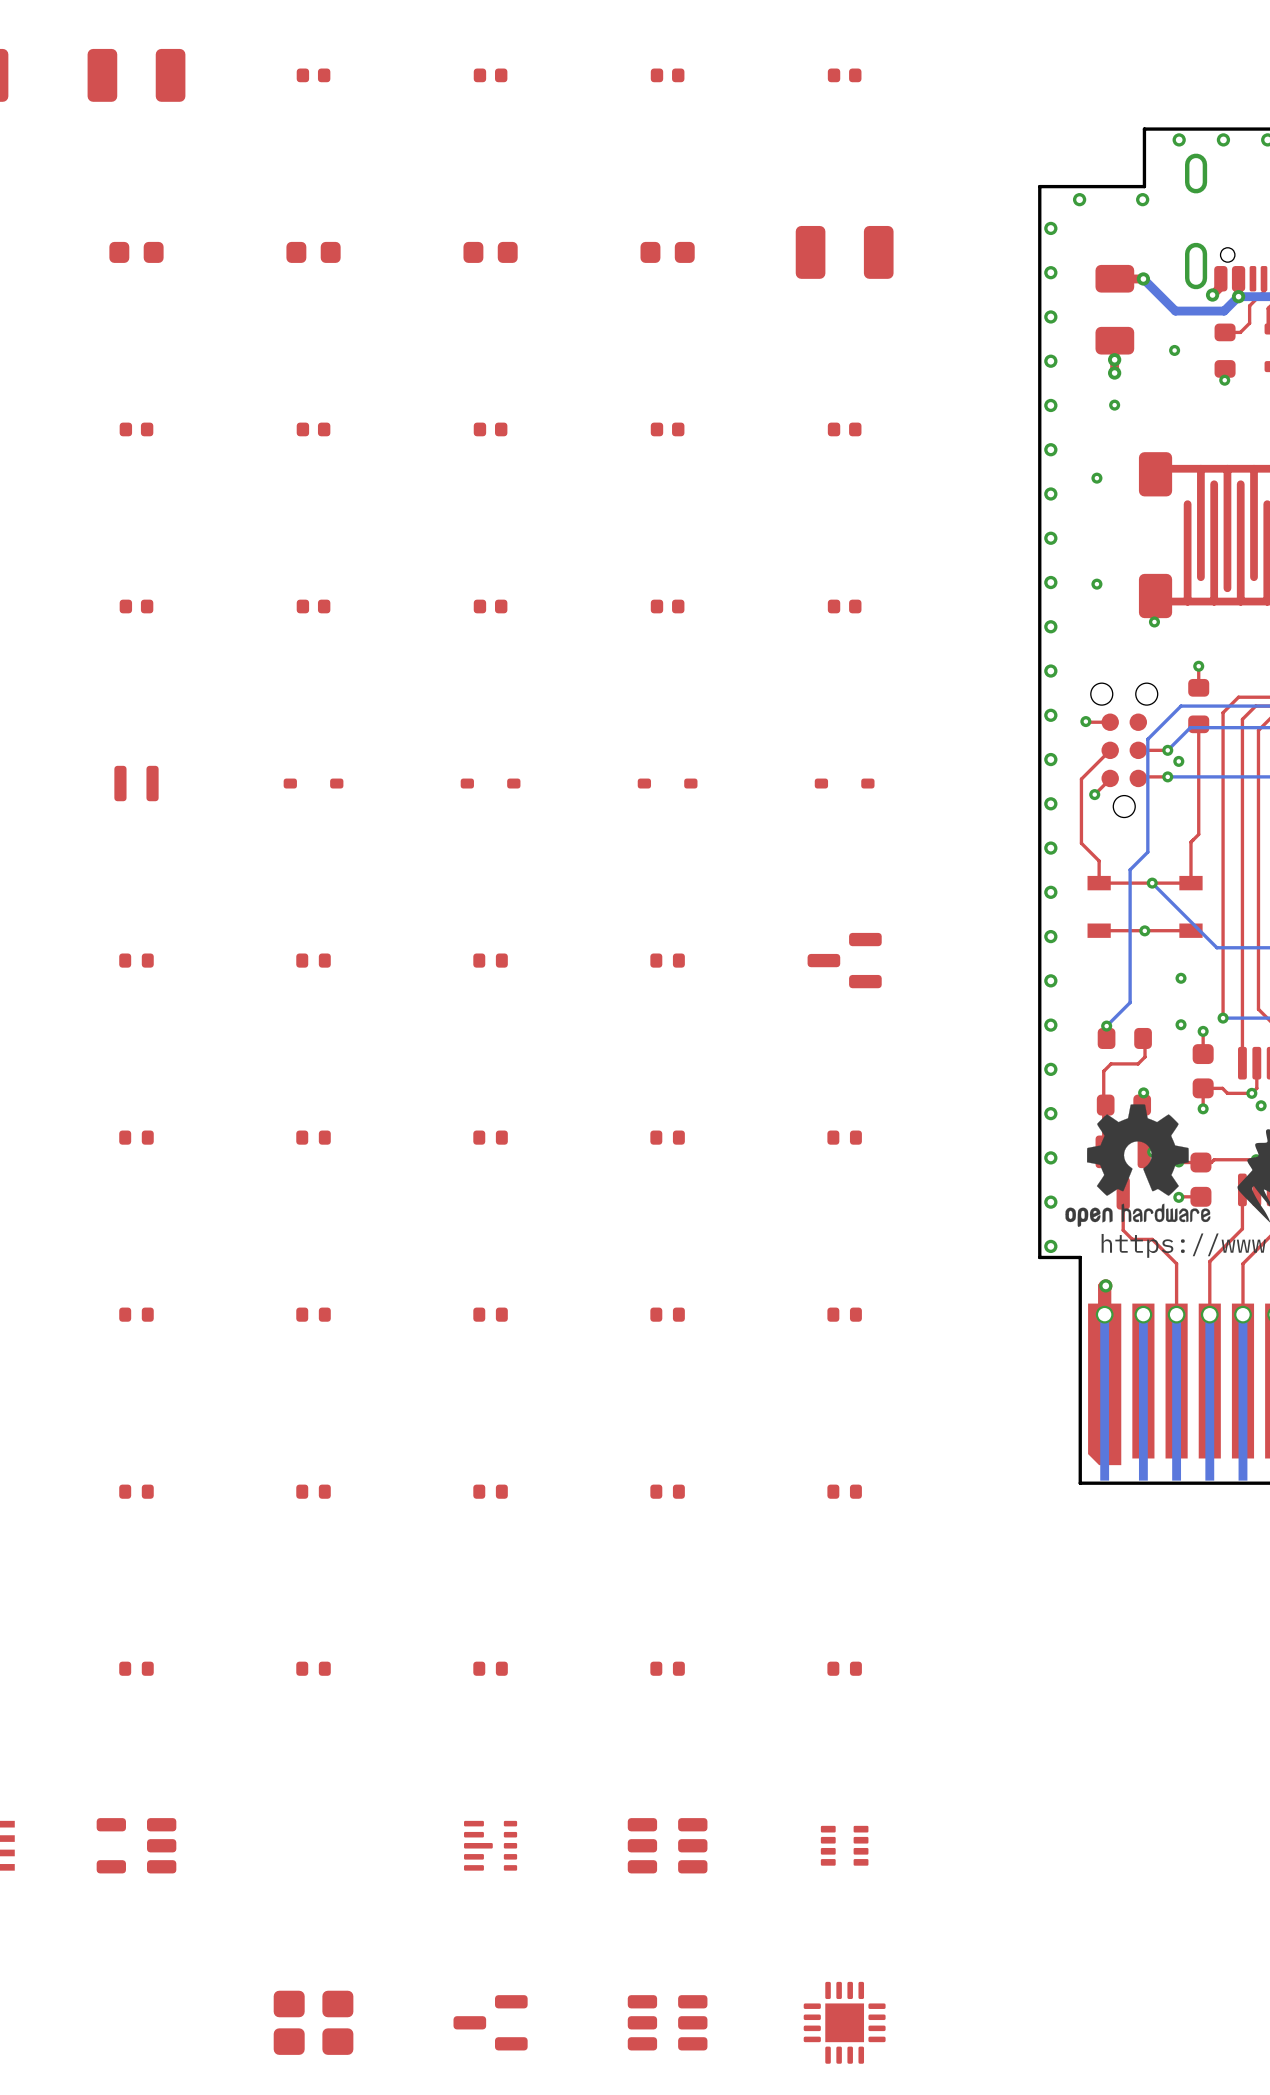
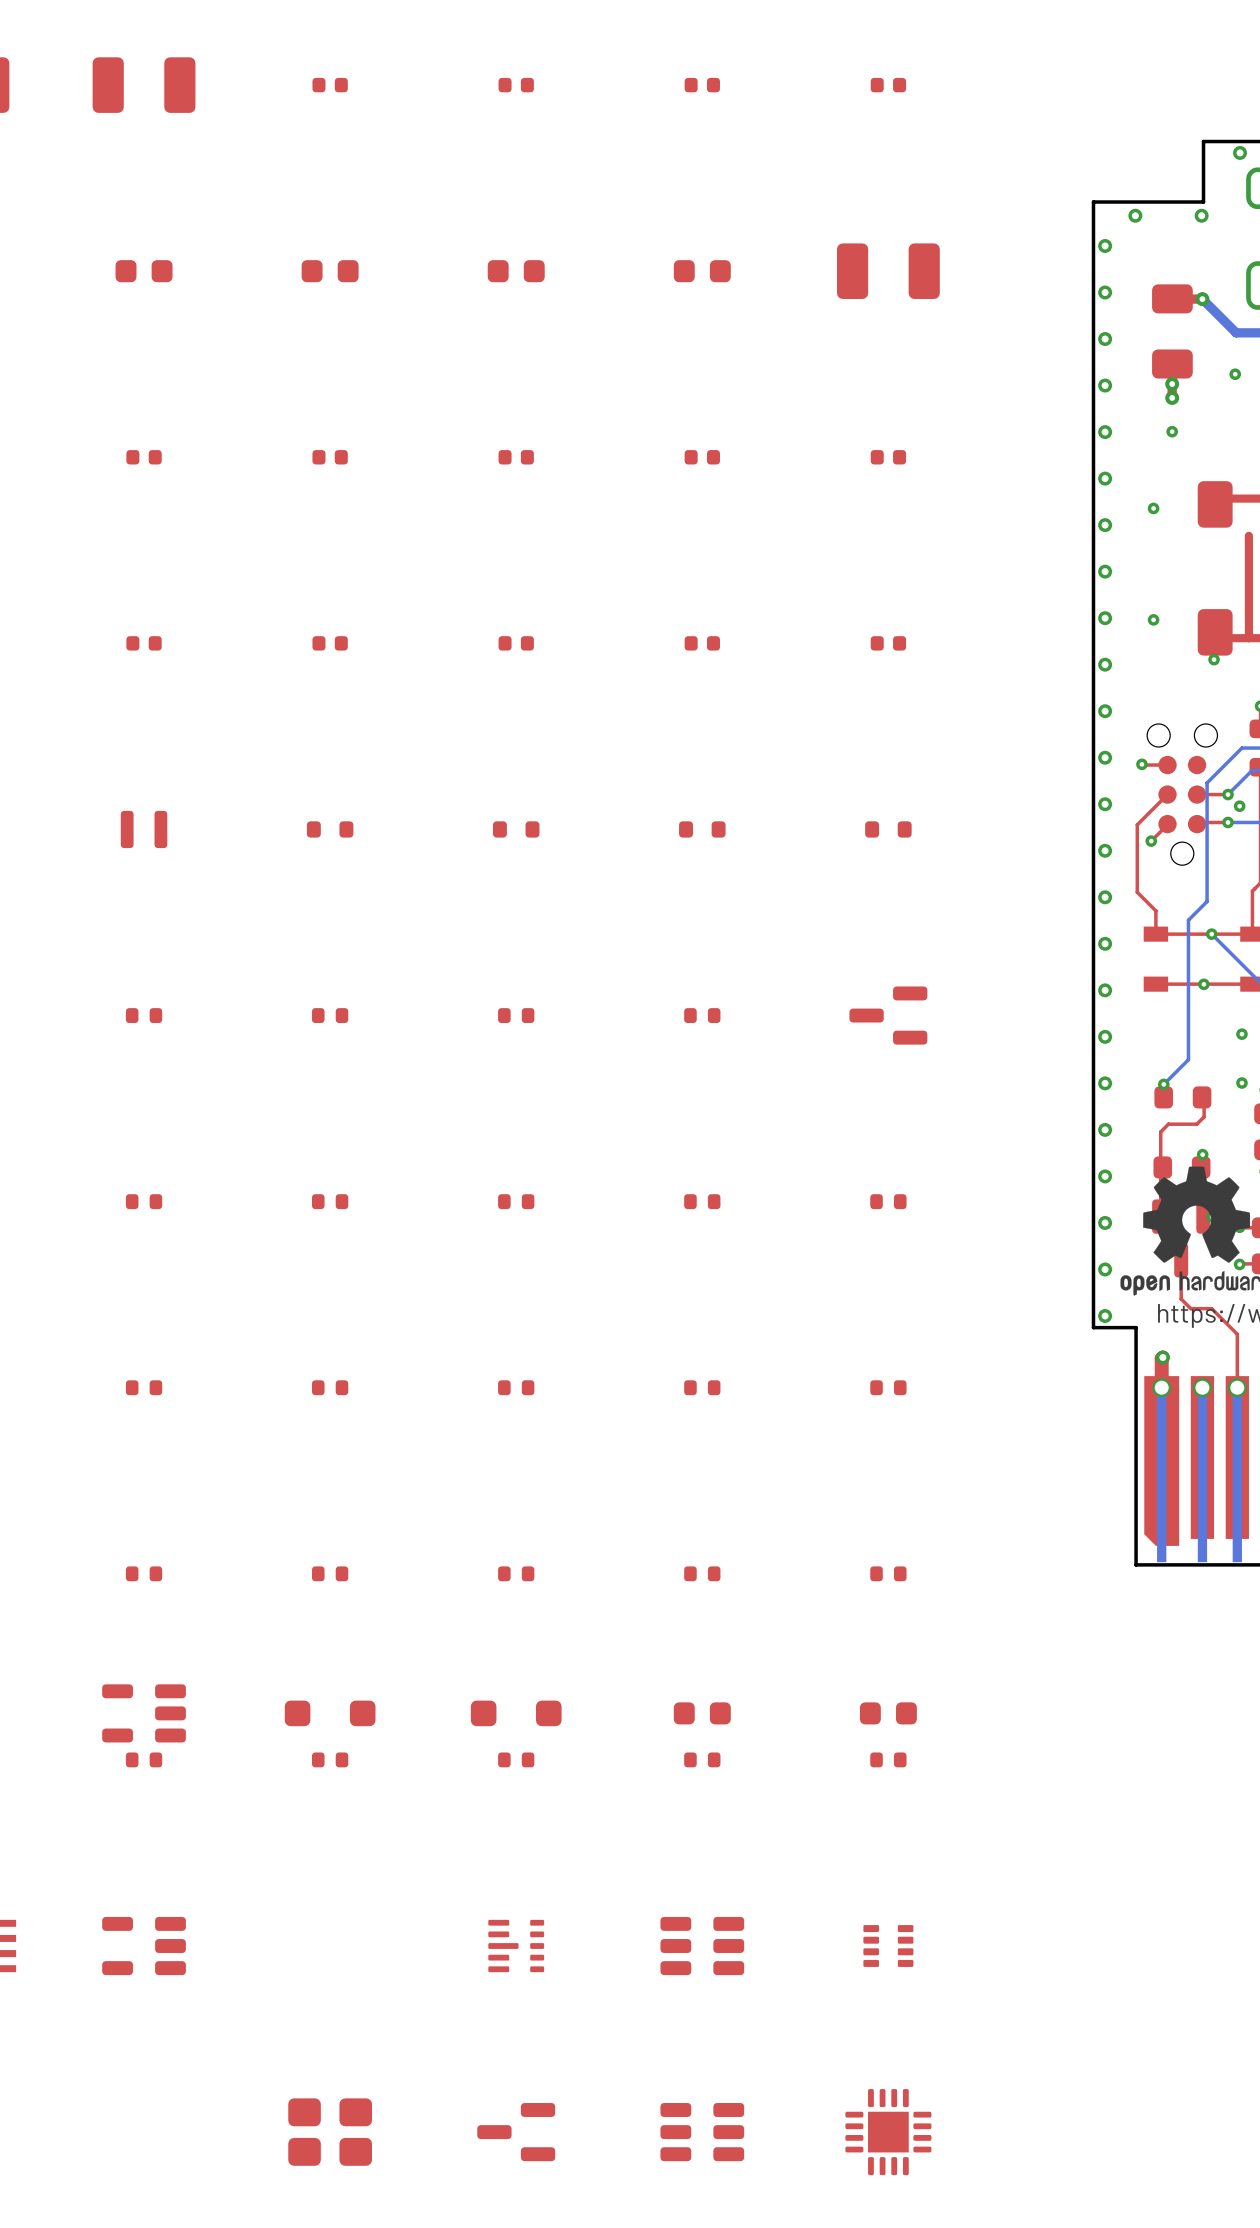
part footprint: [283, 778, 344, 789] -> [306, 821, 354, 838]
part footprint: [460, 778, 521, 789] -> [492, 821, 540, 838]
part footprint: [637, 778, 698, 789] -> [679, 821, 726, 838]
part footprint: [814, 778, 875, 789] -> [865, 821, 912, 838]
part: none -> (144, 1713)
part: none -> (330, 1713)
part: none -> (516, 1713)
part: none -> (702, 1713)
part: none -> (888, 1713)

